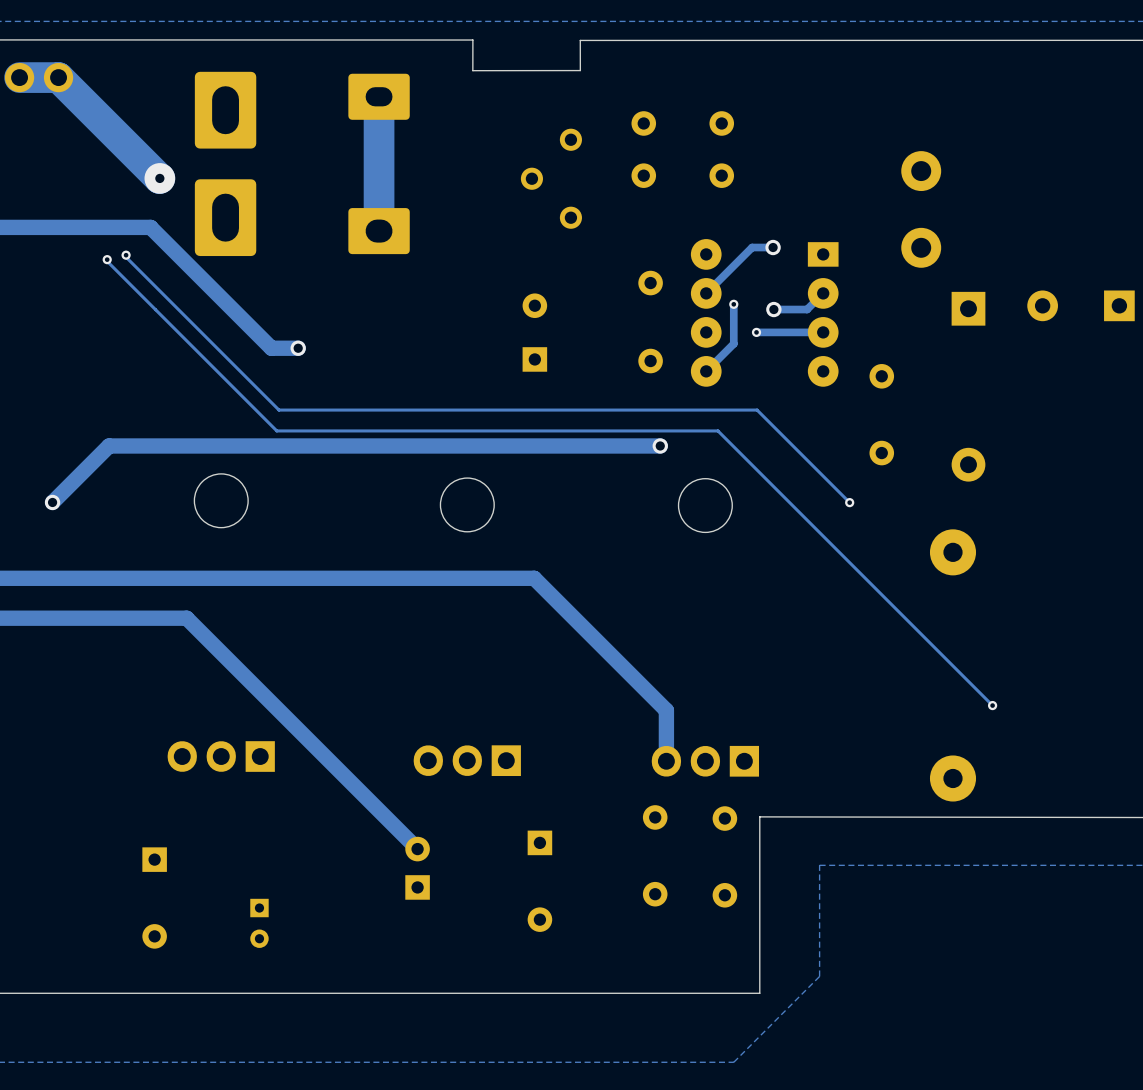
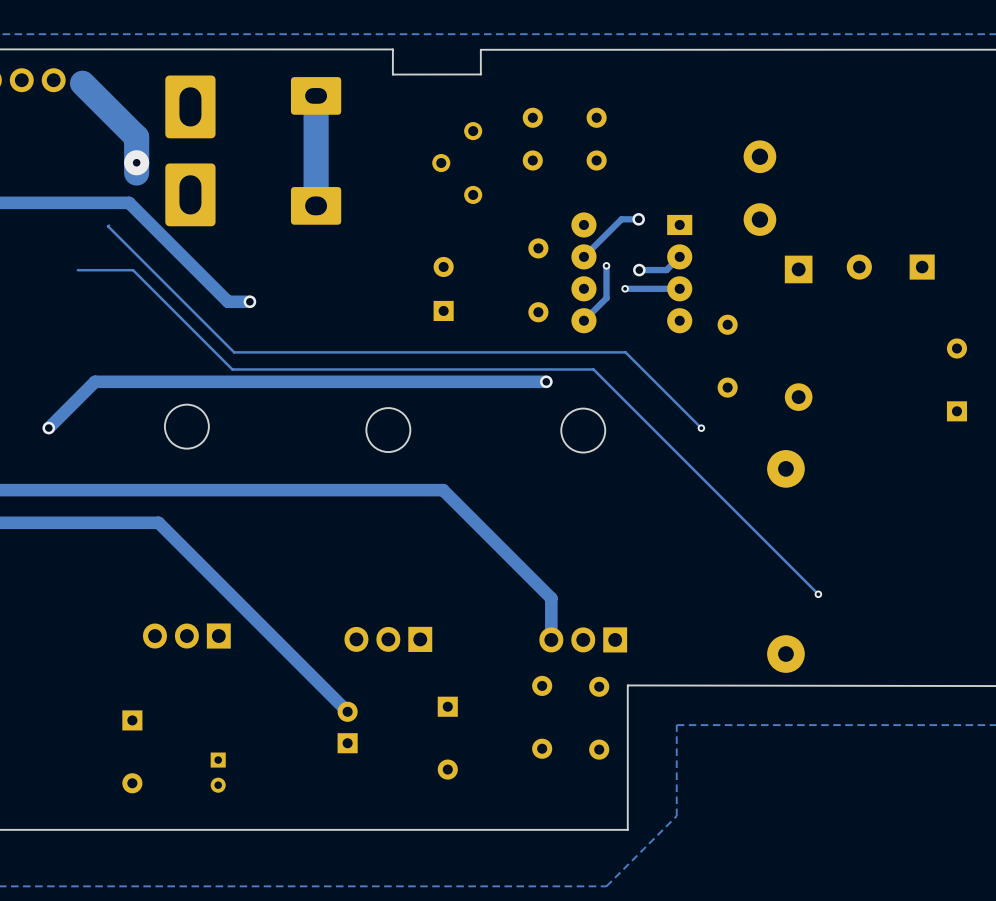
track: (19, 77) (58, 77) (159, 178) -> none
track: none -> (82, 83) (136, 137) (136, 173)
via: (126, 255) -> none
track: (107, 259) (155, 309) -> (77, 270) (133, 270)
via: (107, 259) -> none

